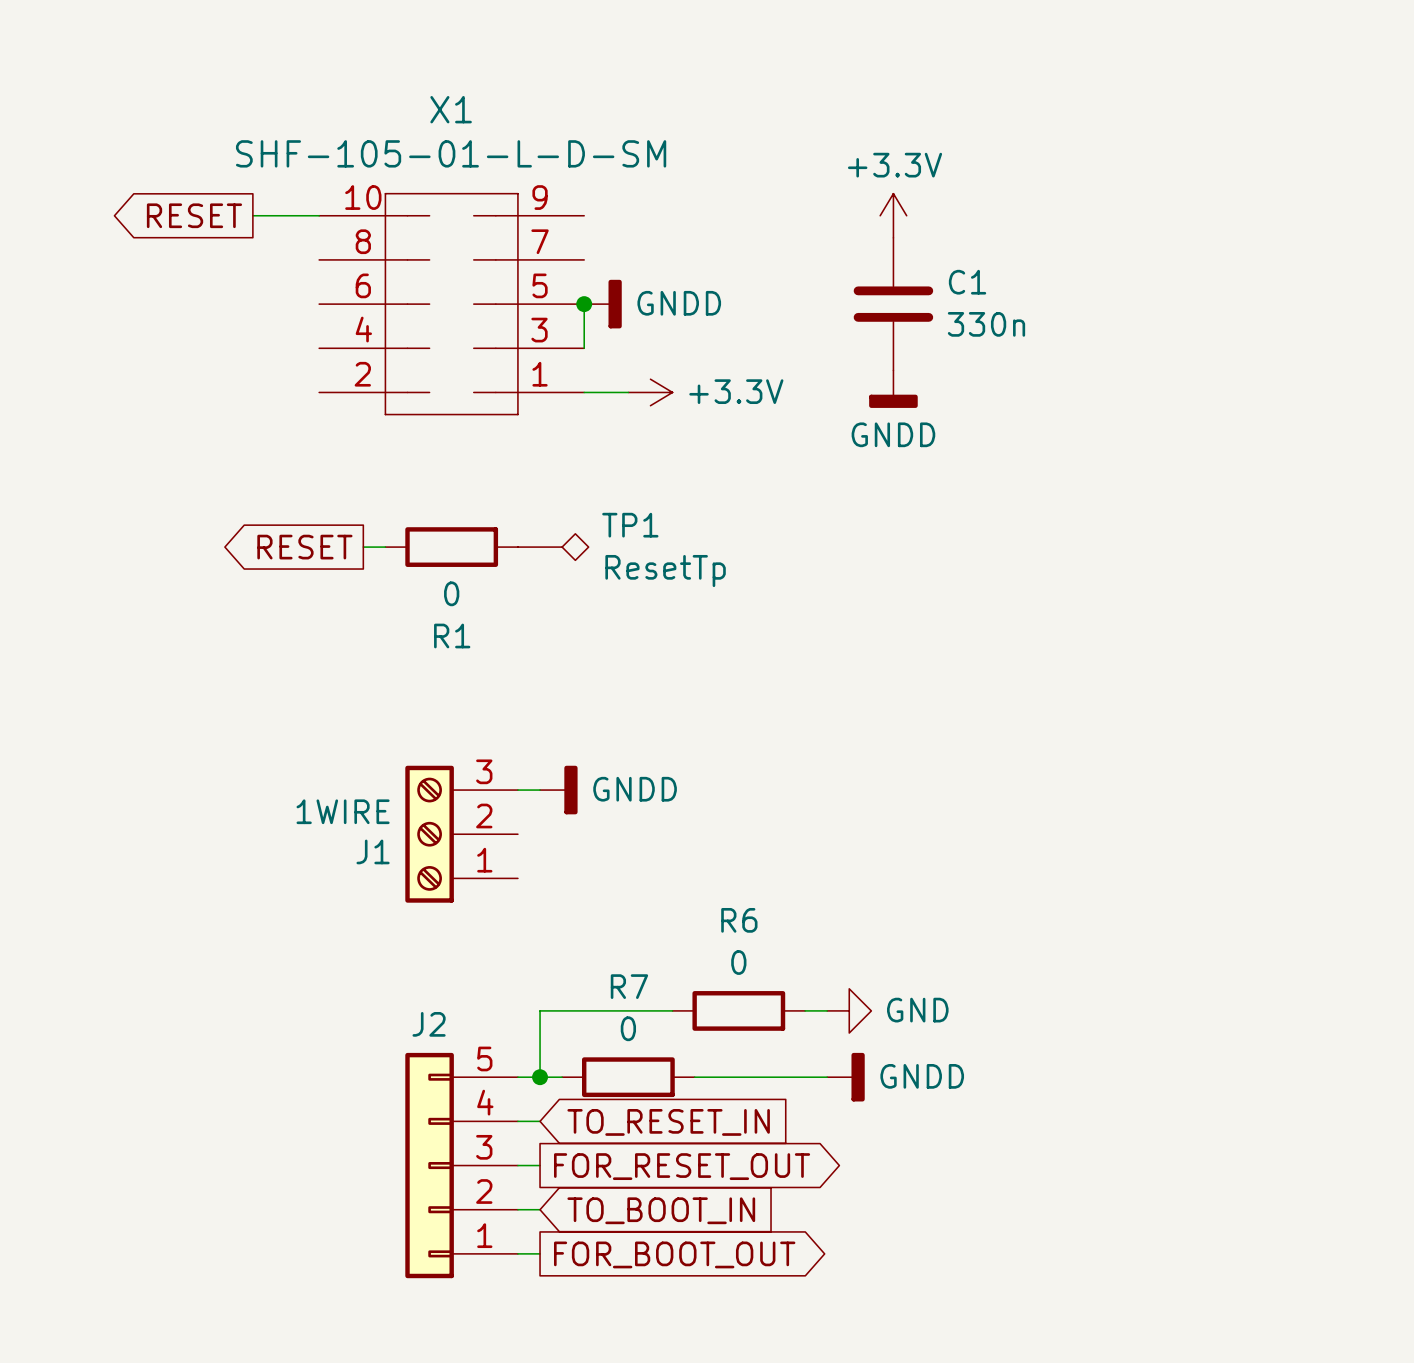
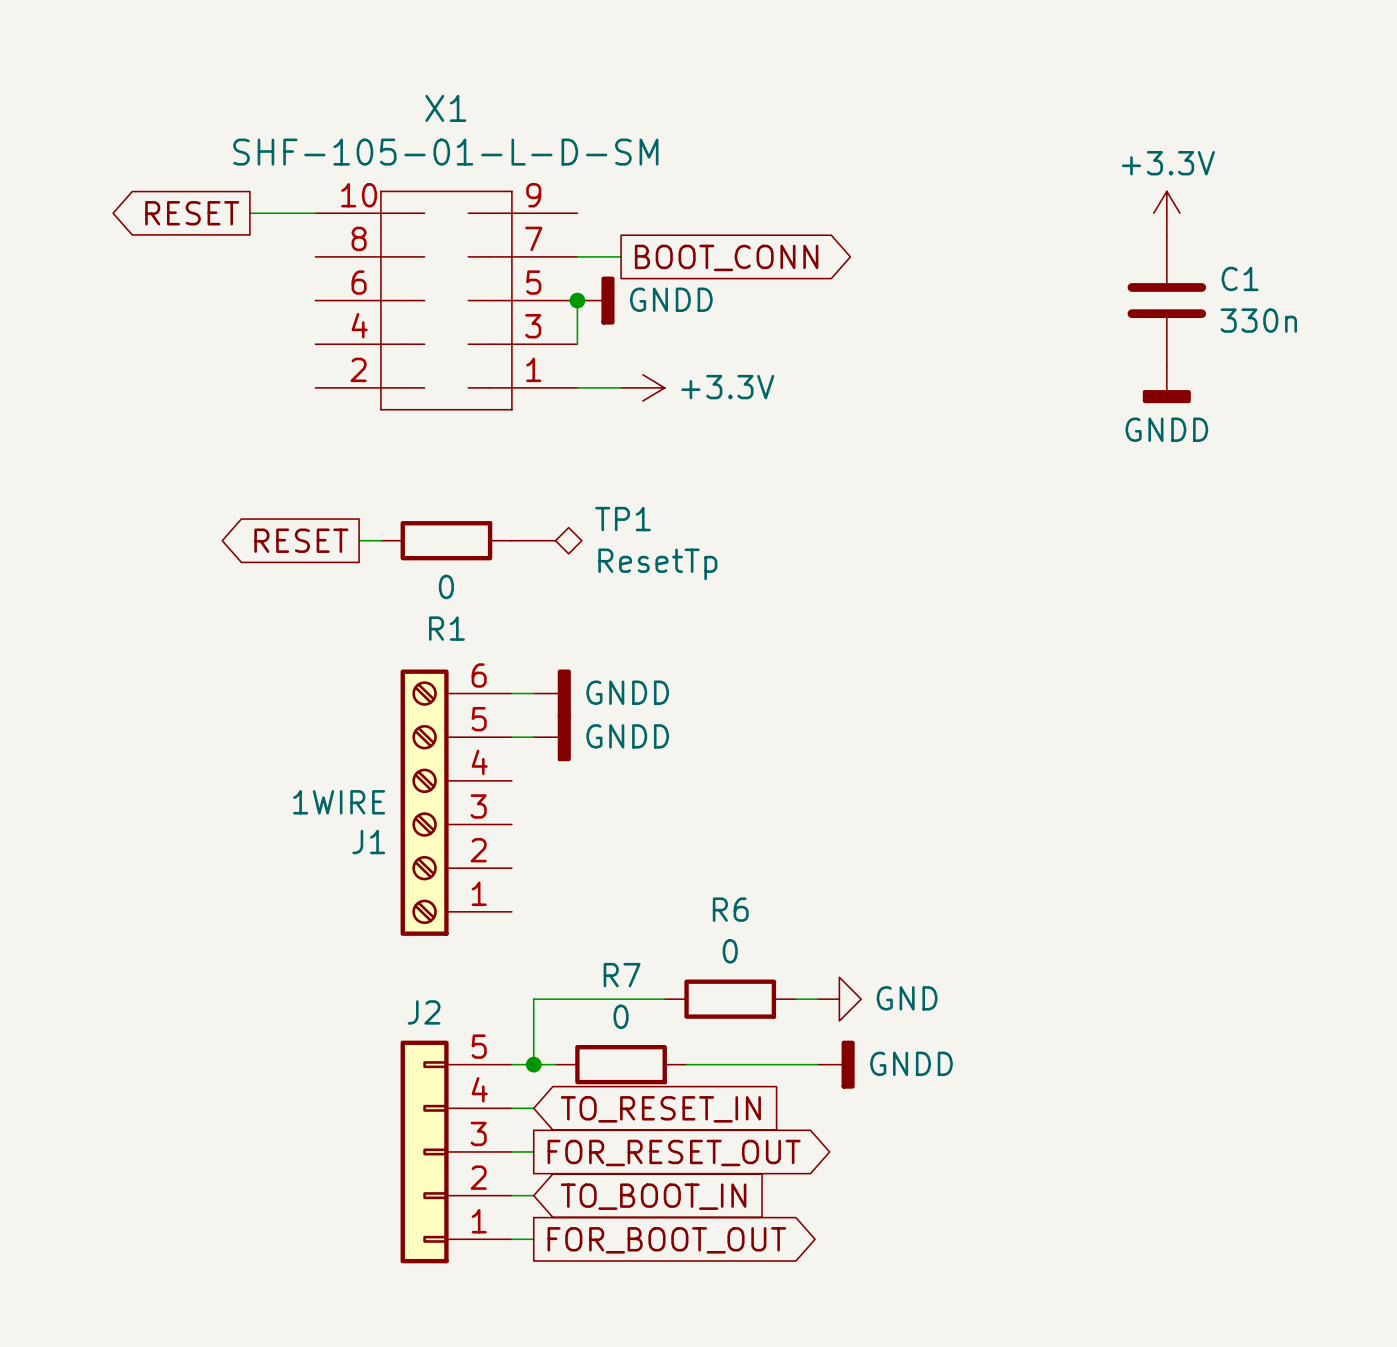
power symbol position: +3.3V (893, 215) -> +3.3V (1166, 213)
wire: none -> (577, 256) (621, 256)
global label: none -> BOOT_CONN (726, 257)
C1 position: (893, 304) -> (1166, 300)
power symbol: GNDD (893, 389) -> none
power symbol: none -> GNDD (1166, 384)
wire: none -> (511, 693) (533, 693)
power symbol: none -> GNDD (552, 693)
power symbol: none -> GNDD (552, 737)
J1 symbol: [405, 765, 518, 903] -> [400, 669, 512, 936]
wire: (517, 790) (540, 790) -> (511, 737) (533, 737)
power symbol: GNDD (558, 790) -> none

